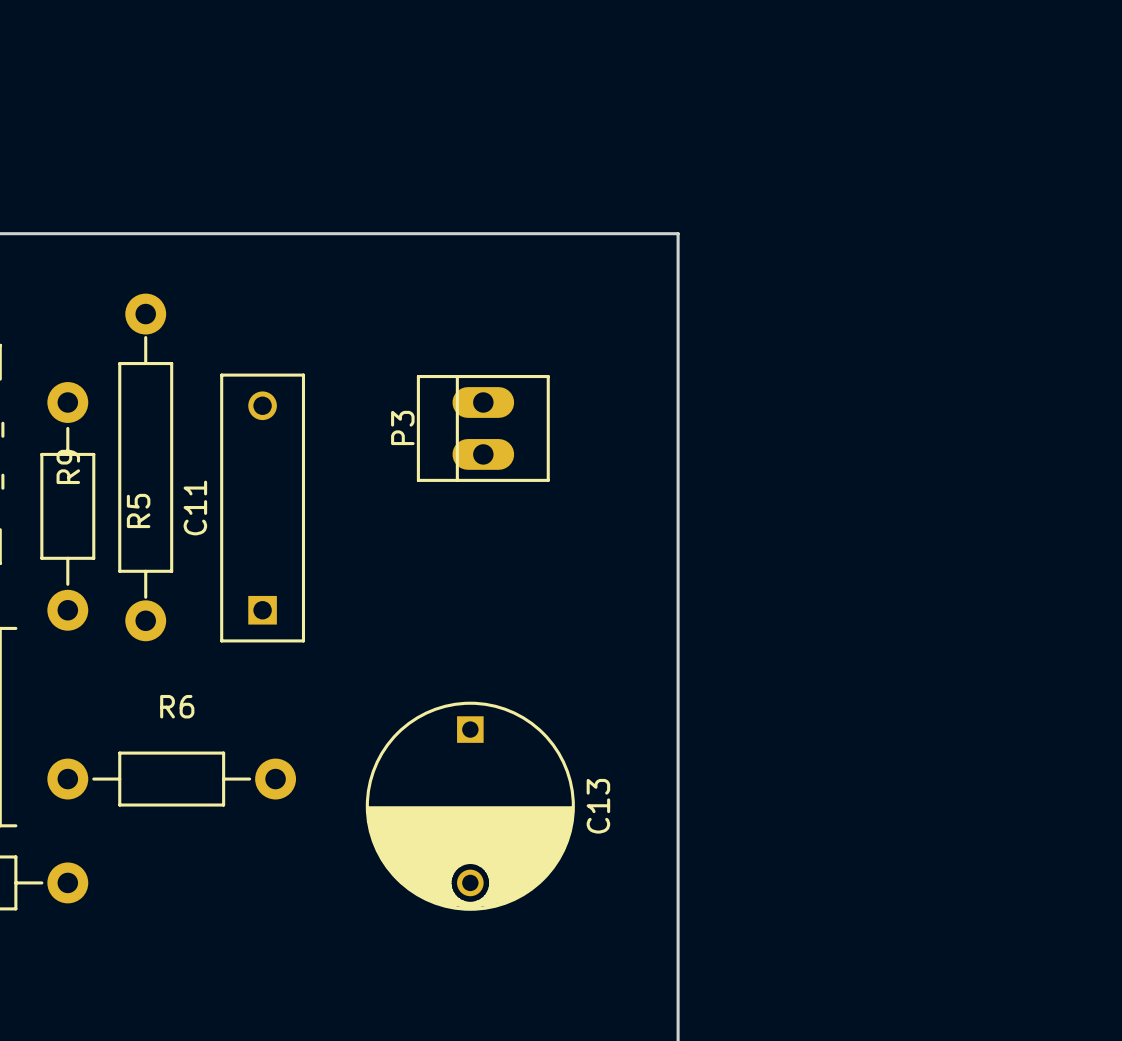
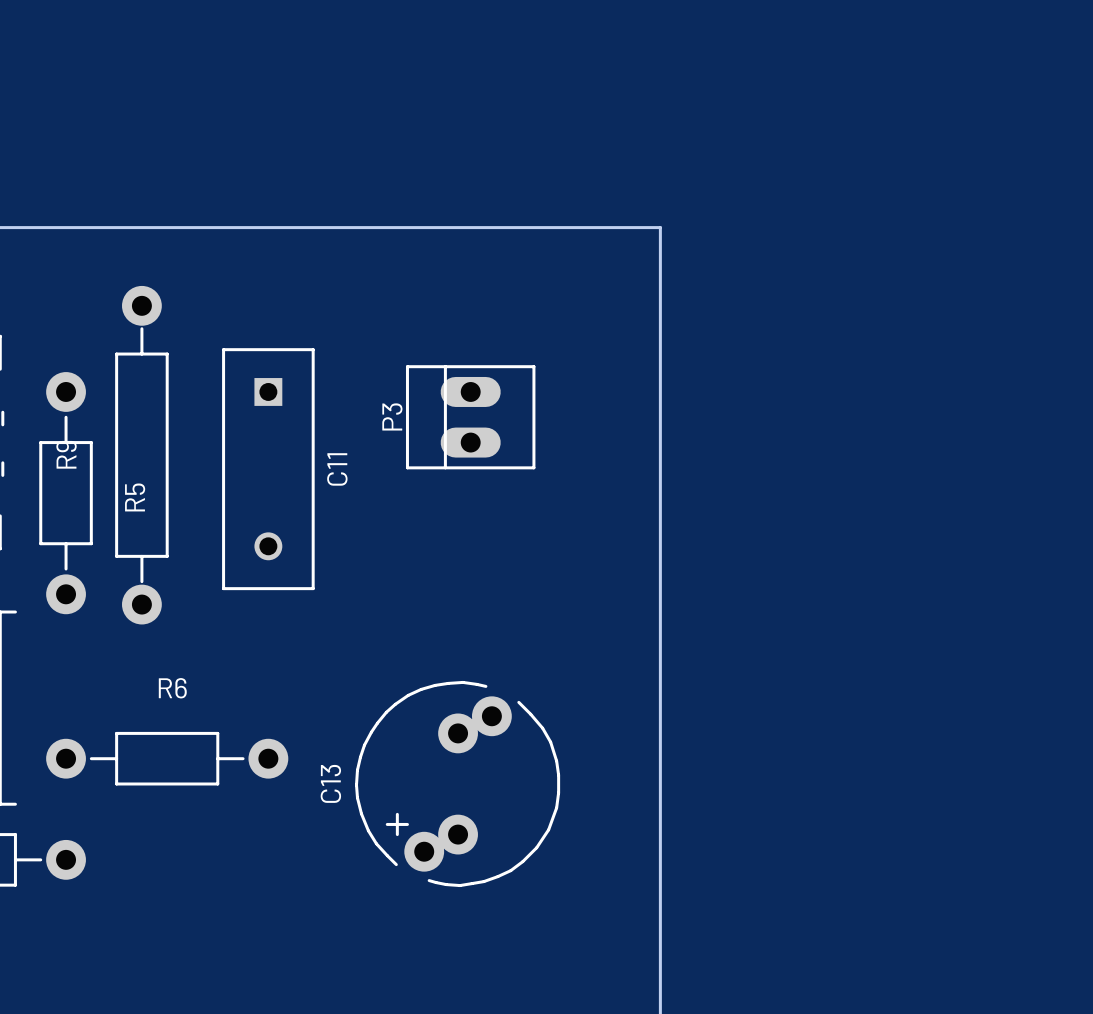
C11 footprint: [220, 373, 306, 643] -> [222, 348, 315, 591]
C11 name position: C11 (195, 508) -> C11 (337, 469)
C13 footprint: [365, 701, 575, 911] -> [354, 680, 561, 888]
C13 name position: C13 (598, 806) -> C13 (330, 783)

